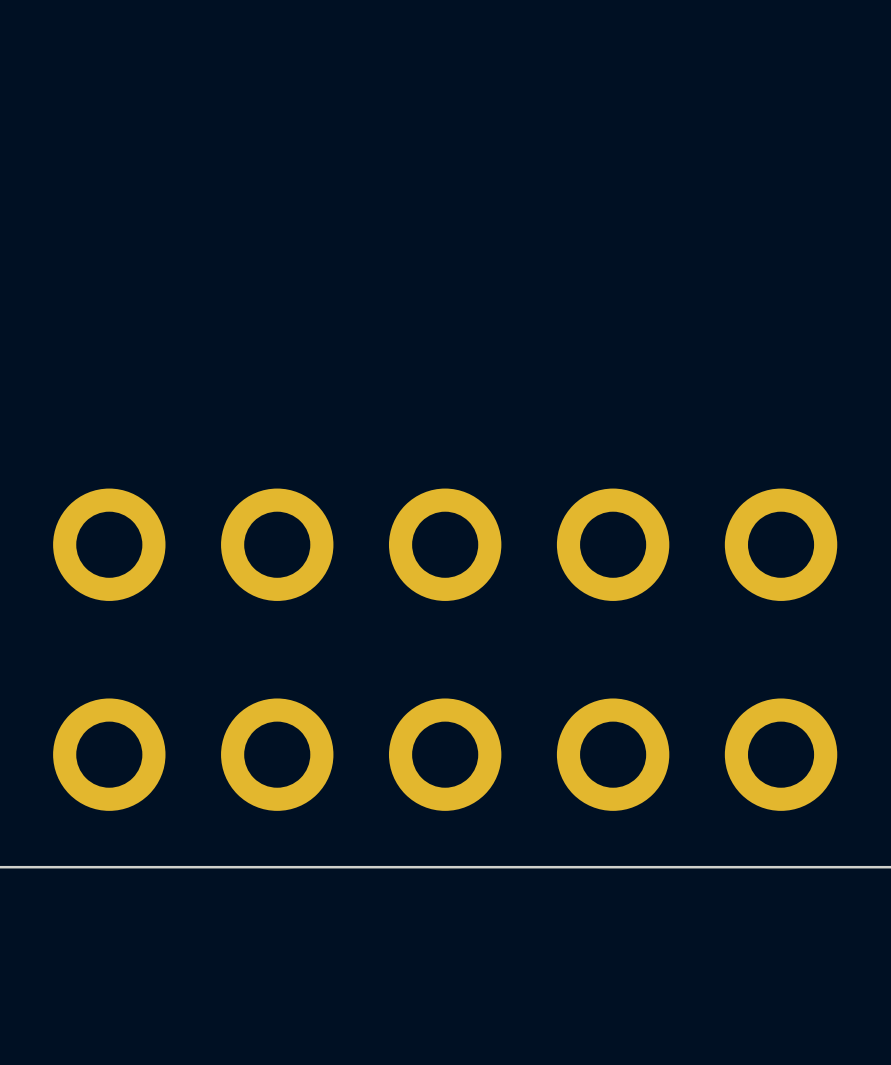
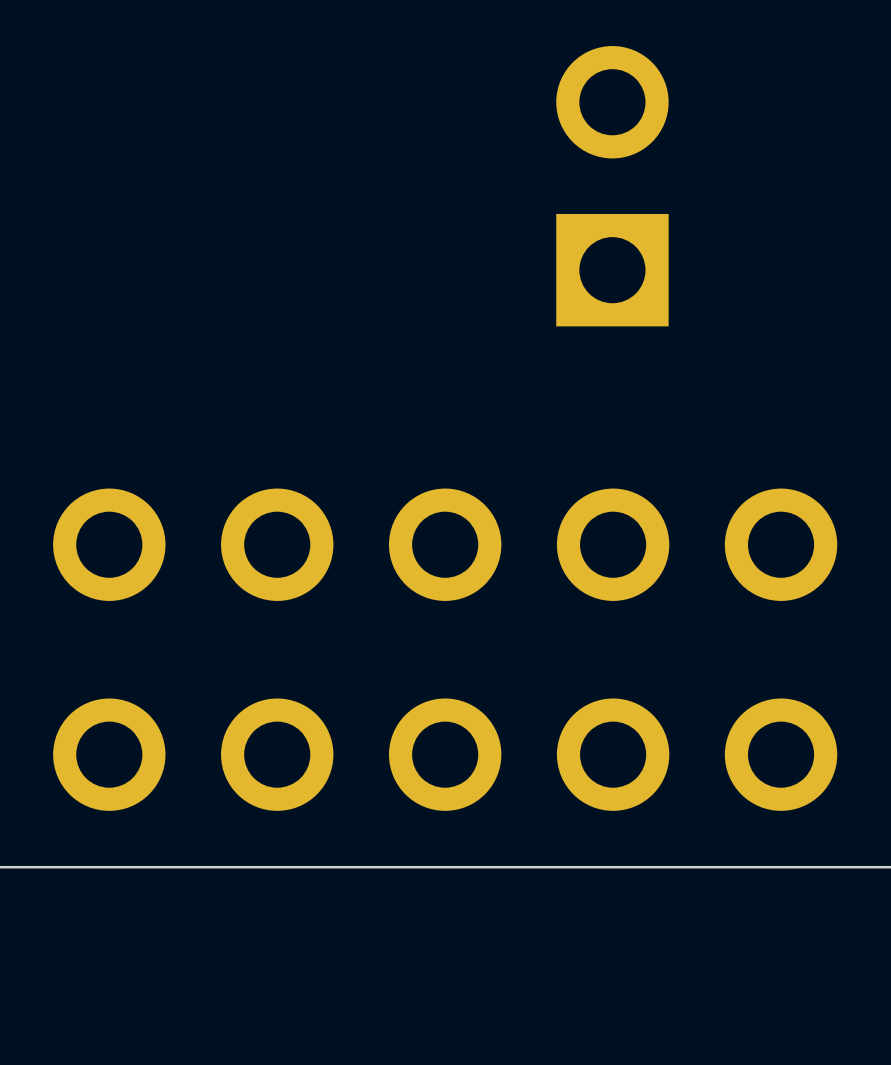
part: none -> (612, 186)

